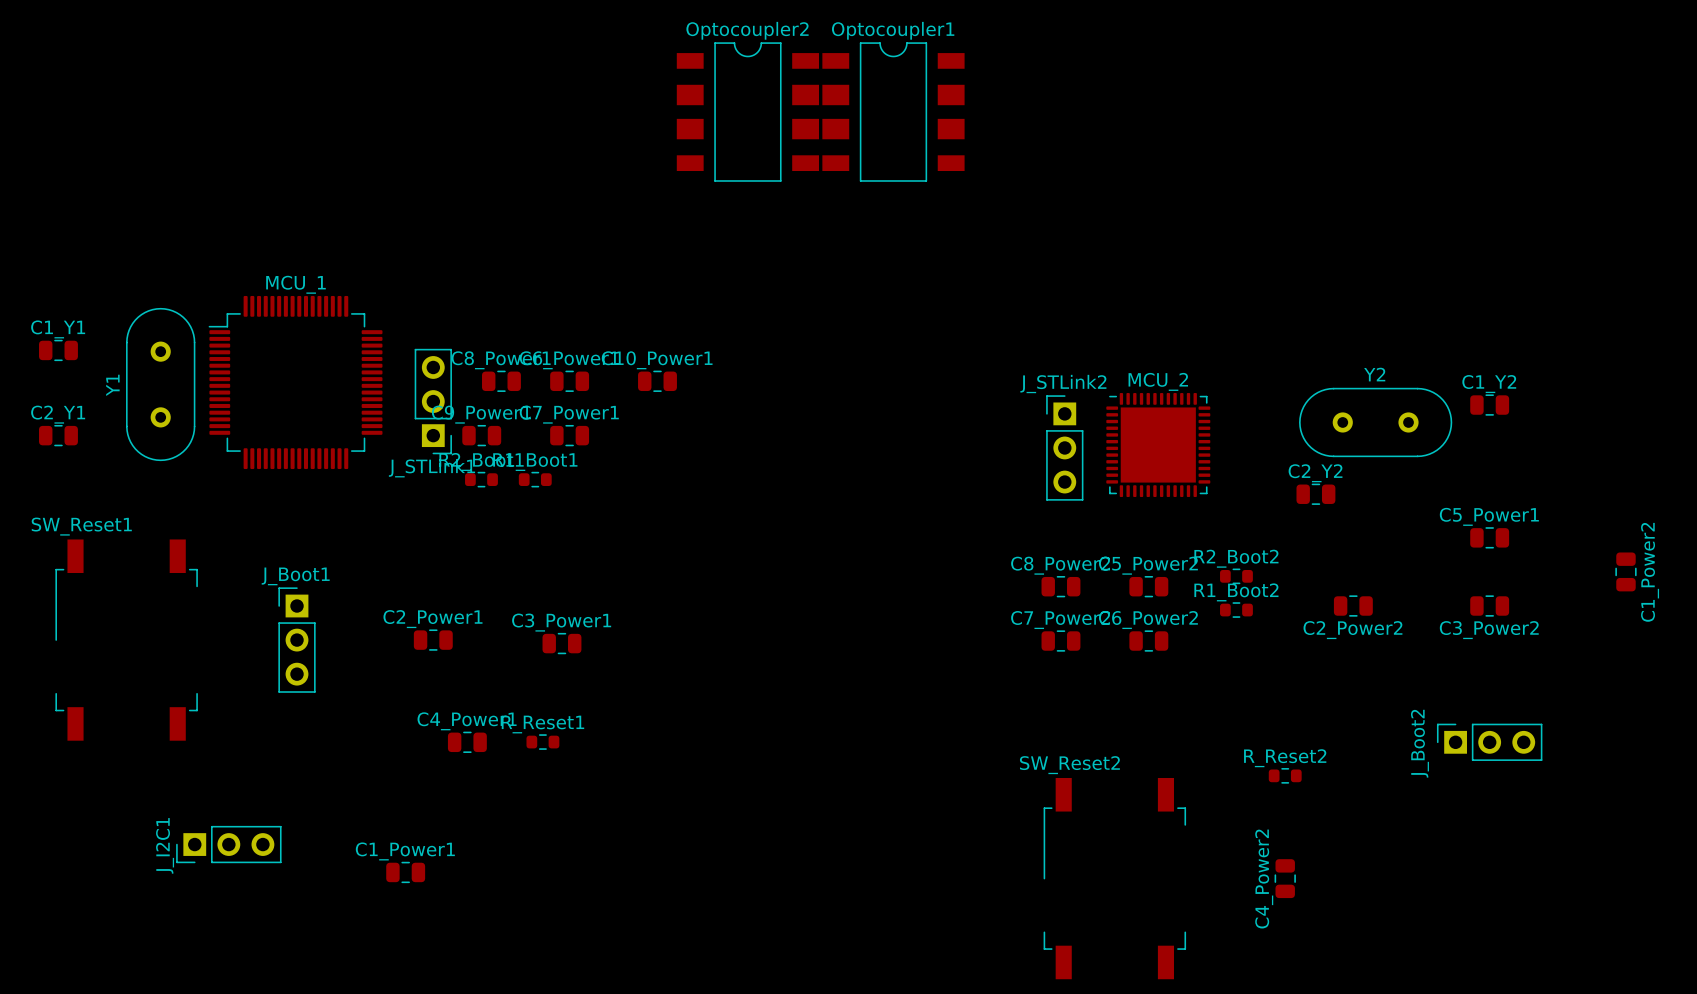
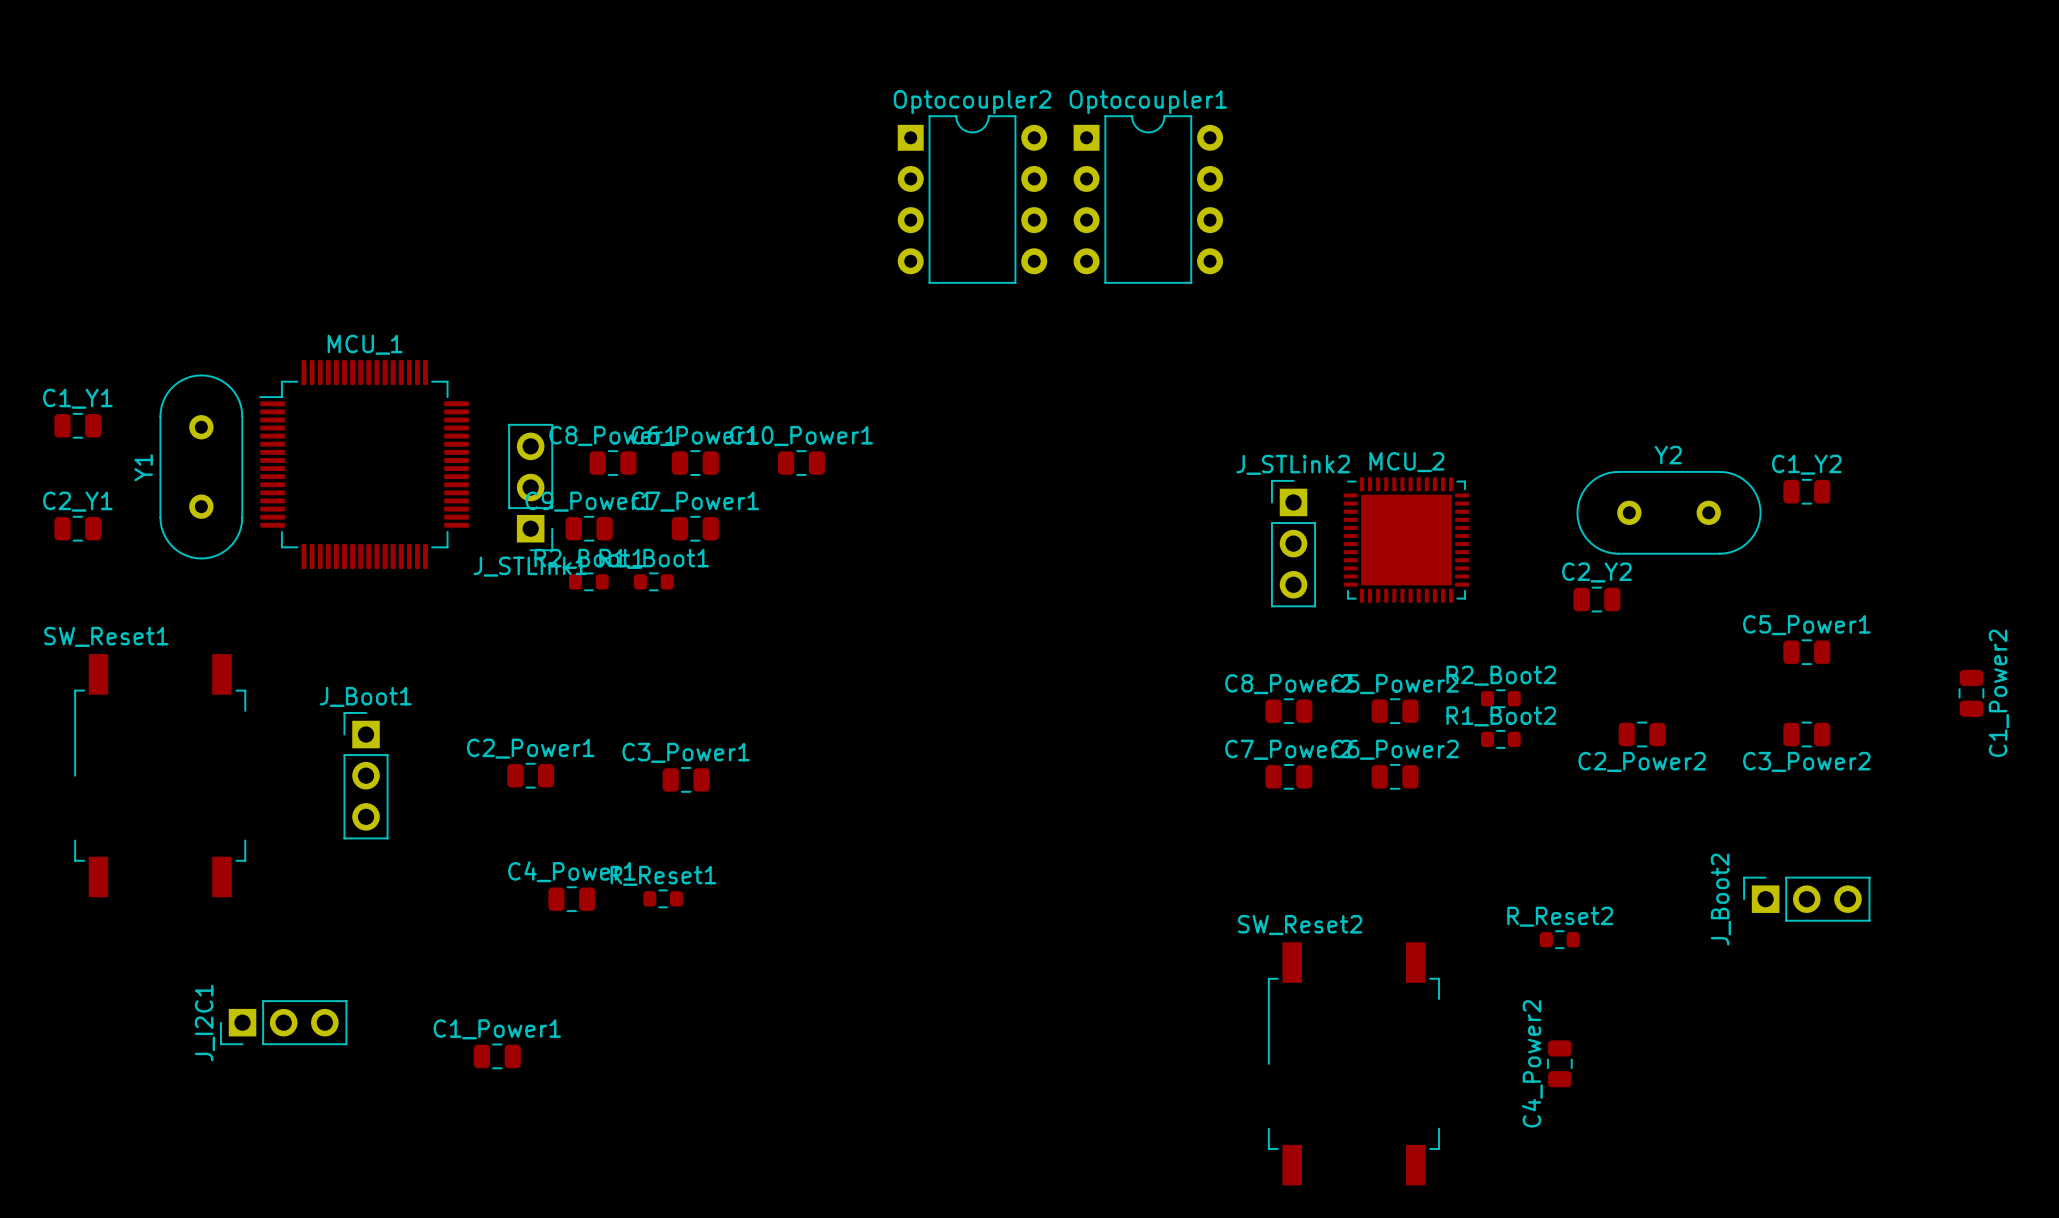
Optocoupler2 footprint: [676, 42, 820, 182] -> [897, 115, 1048, 284]
Optocoupler1 footprint: [822, 42, 965, 182] -> [1073, 115, 1224, 284]

